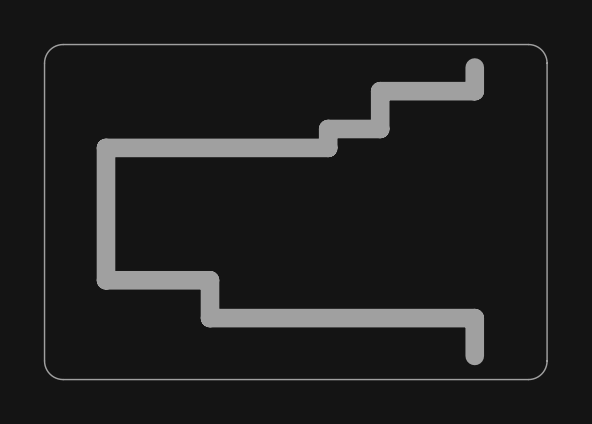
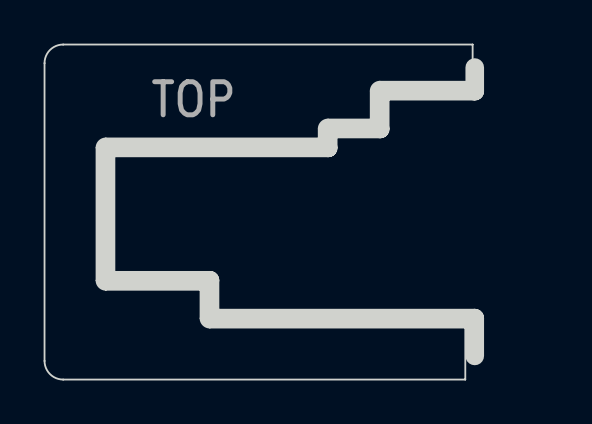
board edge: (472, 44) (530, 44) (539, 48) (546, 58) (547, 360) (543, 372) (533, 378) (465, 379) -> (380, 81) (374, 83) (371, 88) (370, 119) (324, 120) (319, 126) (318, 138) (105, 138) (100, 140) (96, 147) (96, 282) (99, 287) (104, 289) (200, 289) (200, 320) (203, 324) (208, 327) (465, 327) (465, 379)
board edge: none -> (472, 44) (472, 81) (379, 81)
text: none -> TOP (192, 98)

